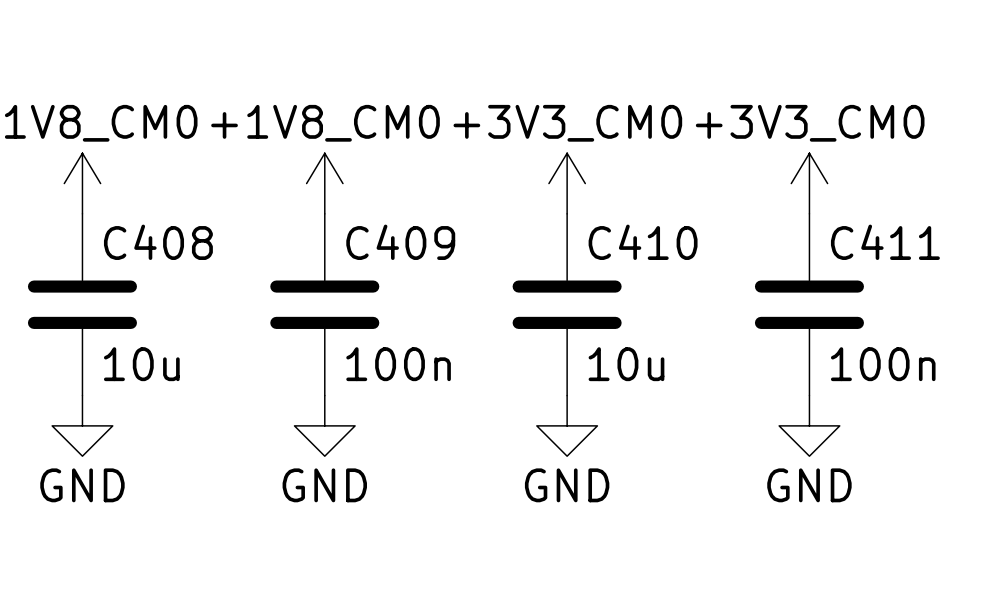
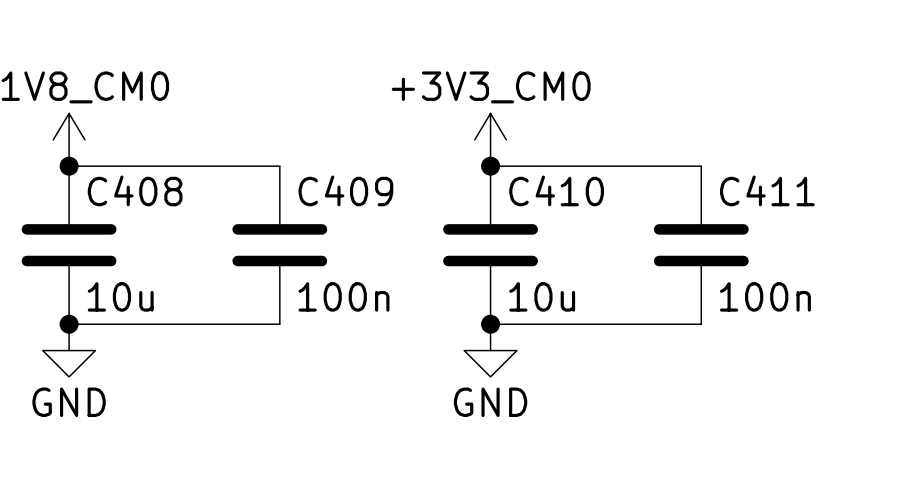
power symbol: +1V8_CM0 (324, 183) -> none
power symbol: +3V3_CM0 (809, 183) -> none
wire: none -> (69, 166) (279, 166)
junction: none -> (69, 166)
wire: none -> (490, 166) (701, 166)
junction: none -> (490, 166)
wire: none -> (69, 324) (279, 324)
junction: none -> (69, 324)
wire: none -> (490, 324) (701, 324)
junction: none -> (490, 324)
power symbol: GND (324, 425) -> none
power symbol: GND (809, 425) -> none

